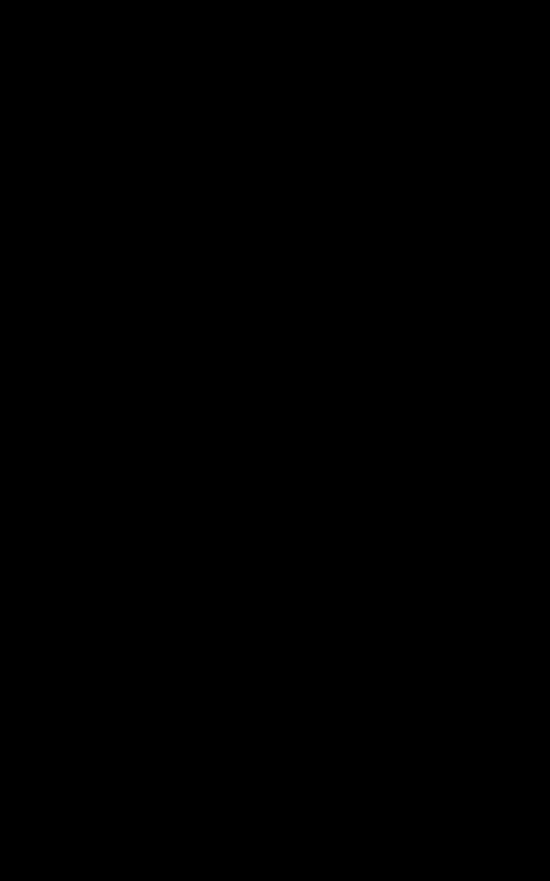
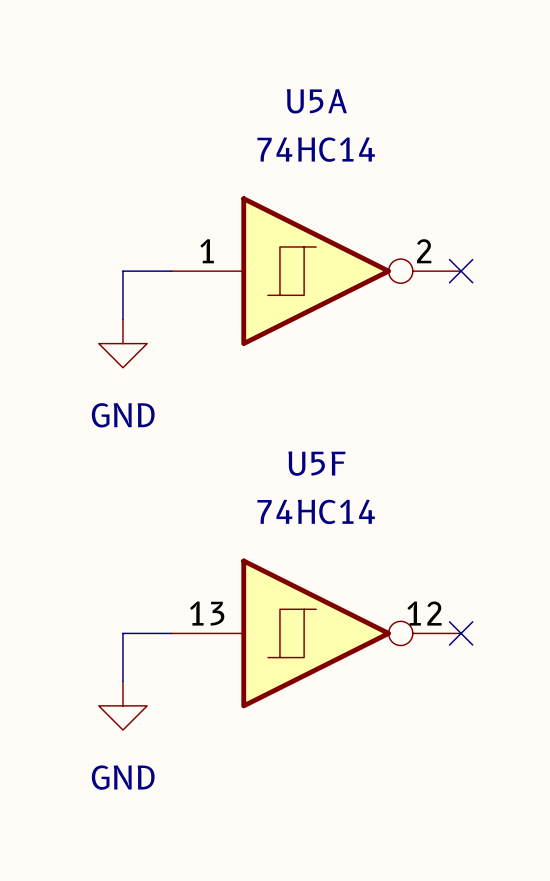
wire: none -> (171, 271) (122, 271) (122, 319)
U5A: none -> 74HC14 (316, 271)
no-connect mark: none -> (461, 271)
power symbol: none -> GND (122, 343)
wire: none -> (171, 633) (122, 633) (122, 681)
U5F: none -> 74HC14 (316, 633)
no-connect mark: none -> (461, 633)
power symbol: none -> GND (122, 705)

